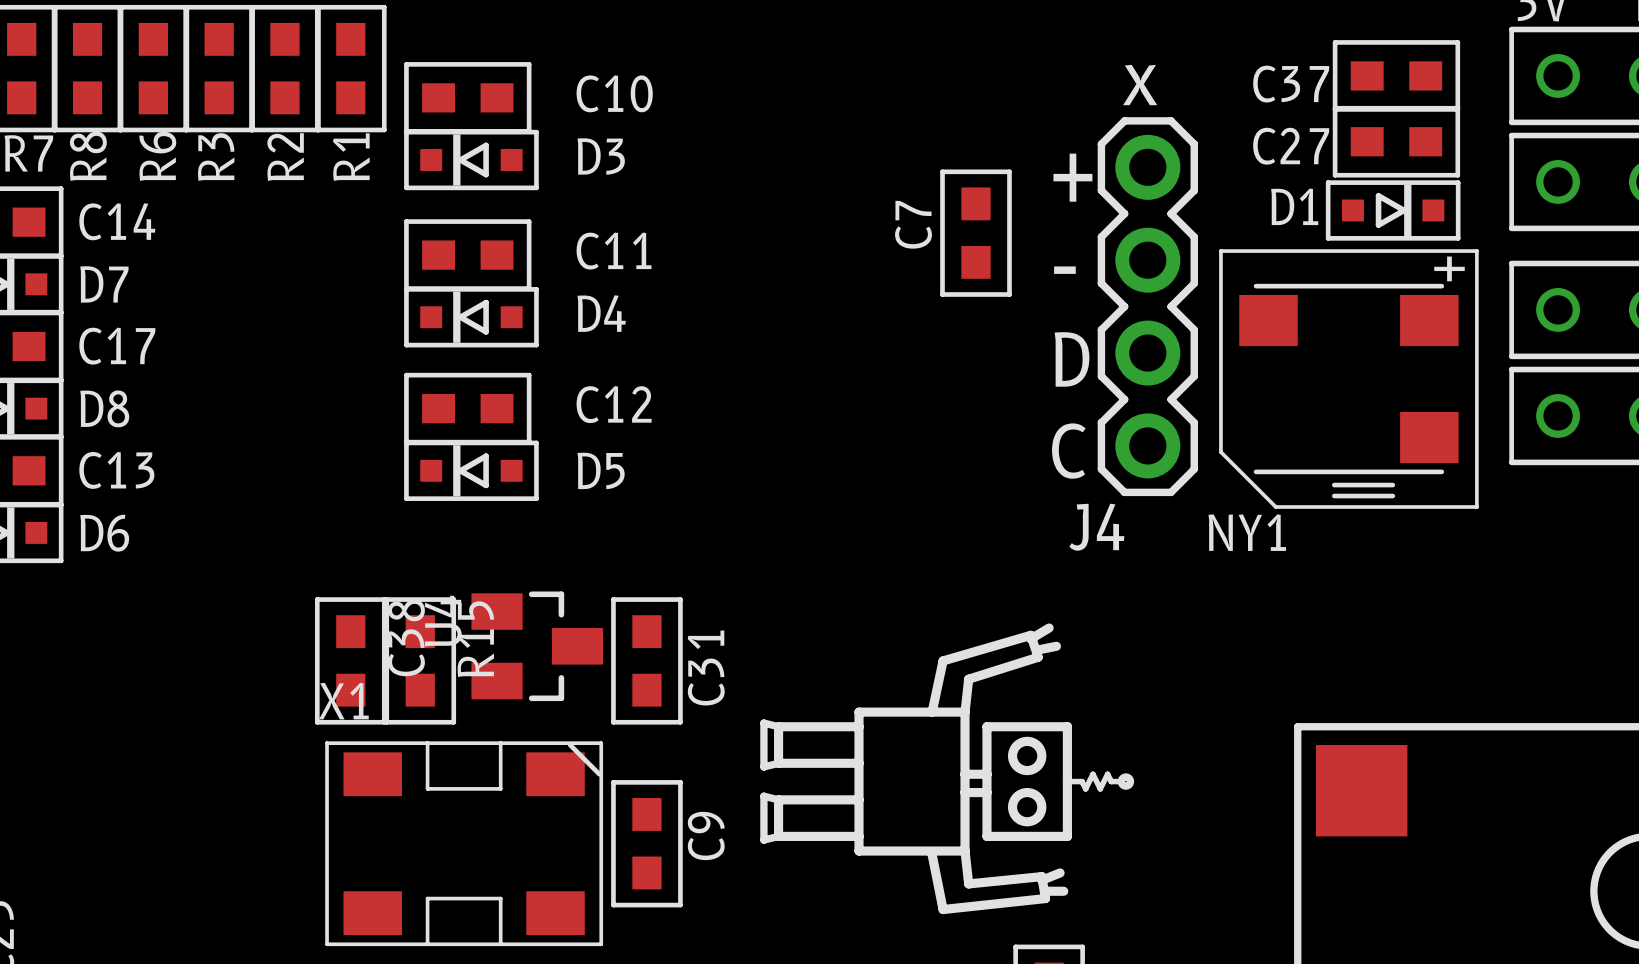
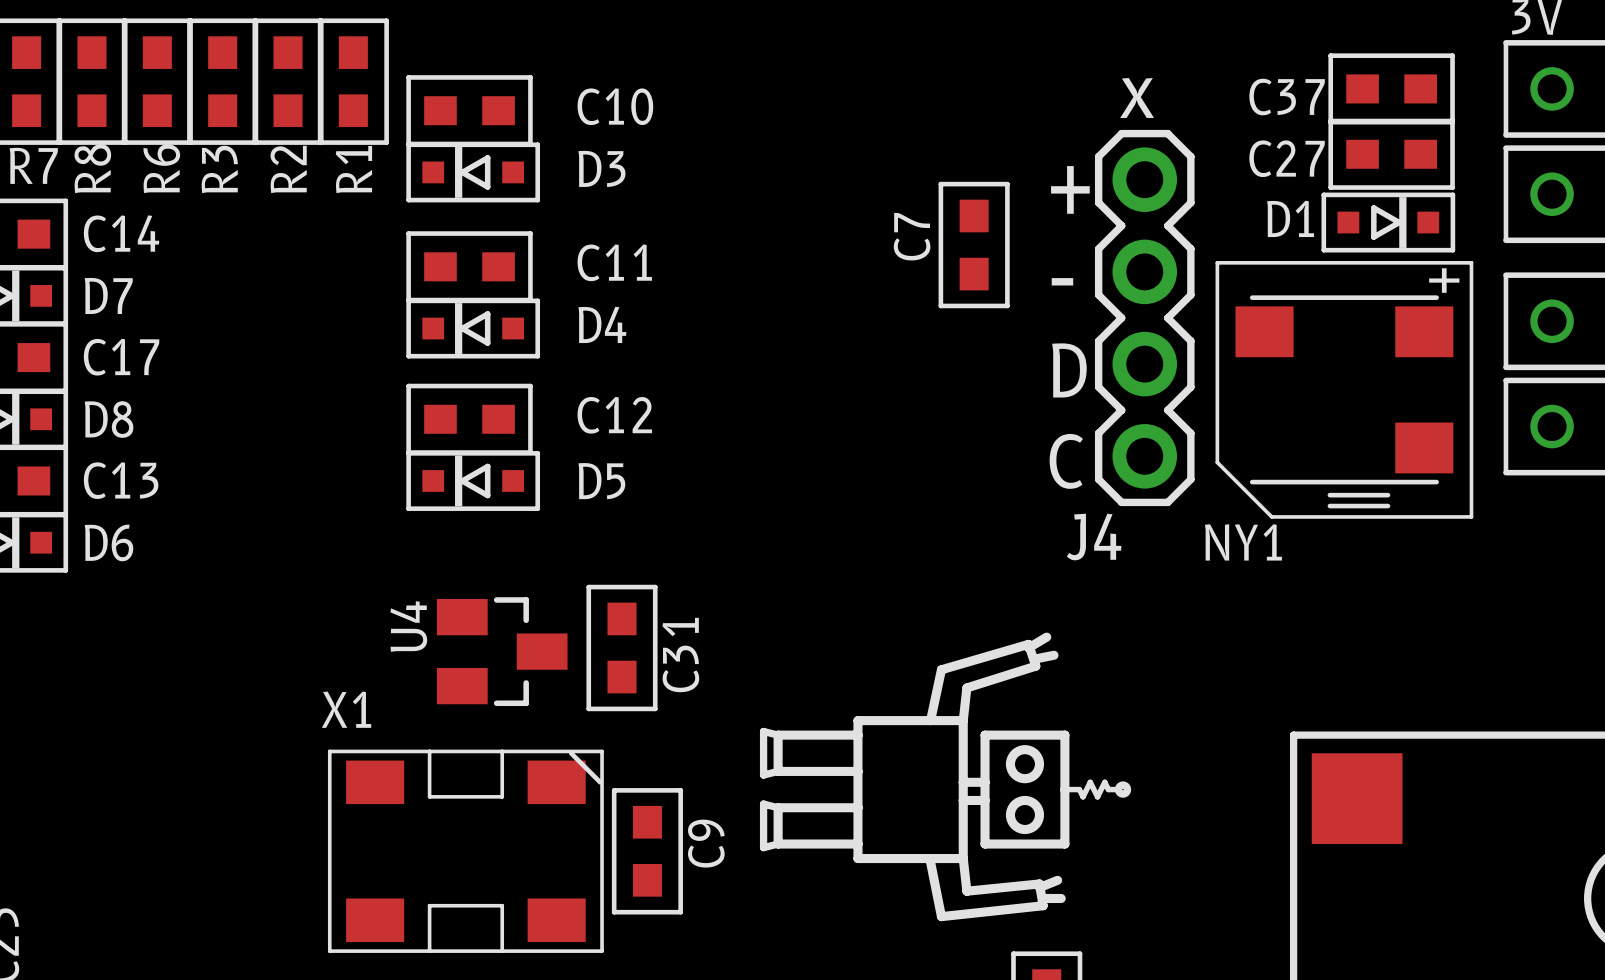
U4 position: (537, 646) -> (502, 651)
C38: (350, 660) -> none
R15: (420, 660) -> none
C31 position: (646, 660) -> (622, 647)

